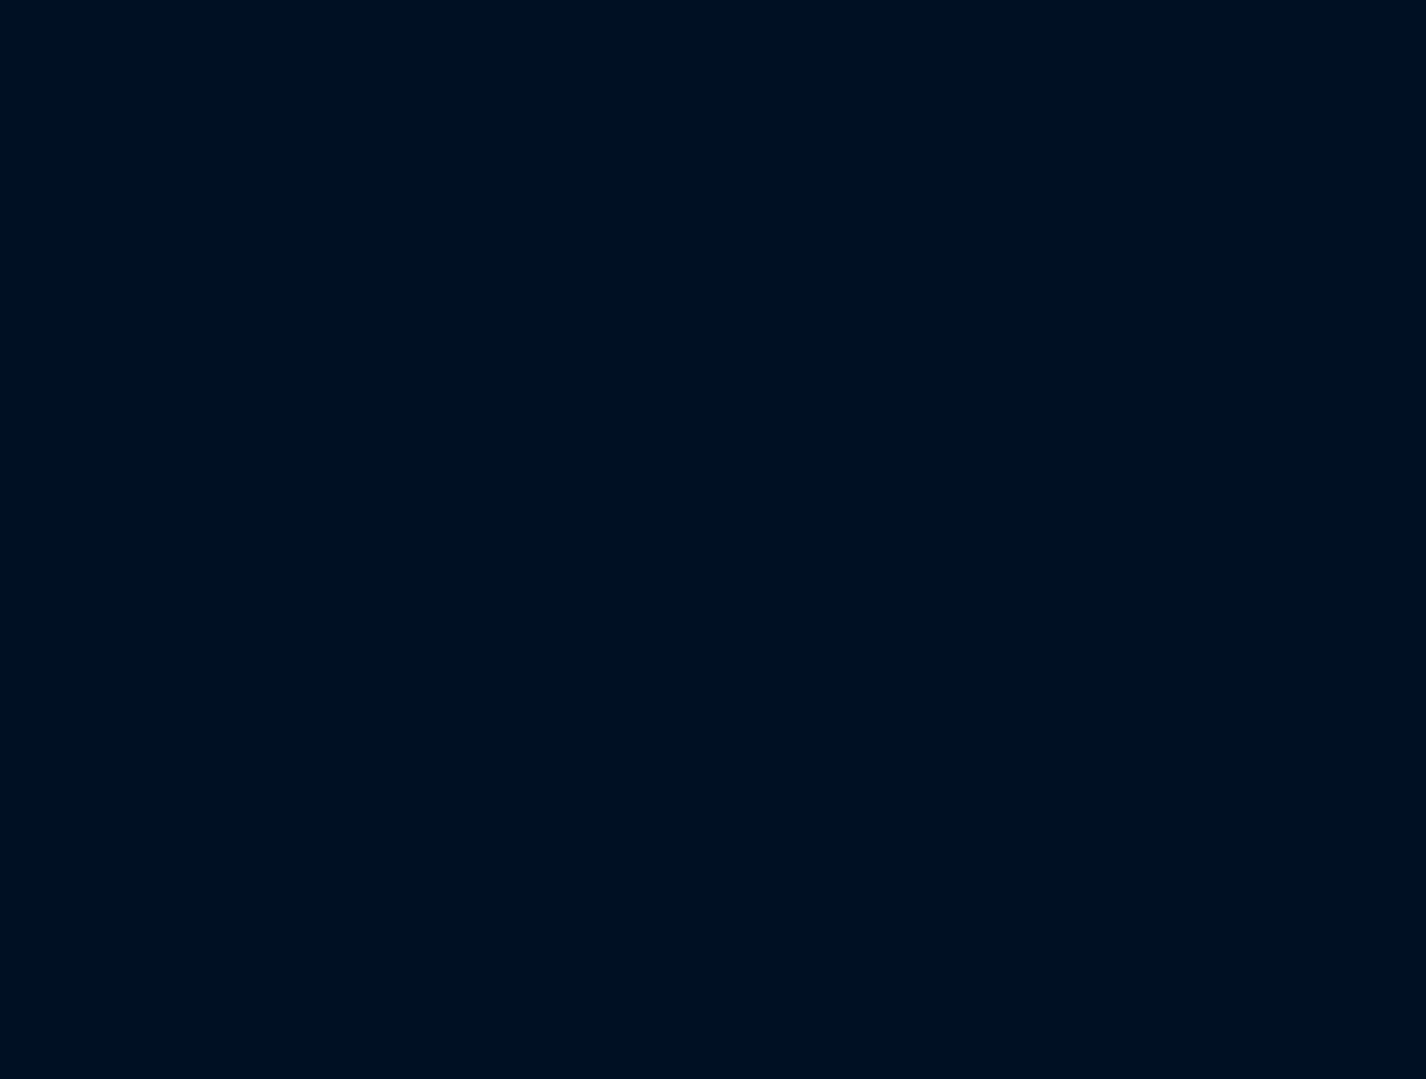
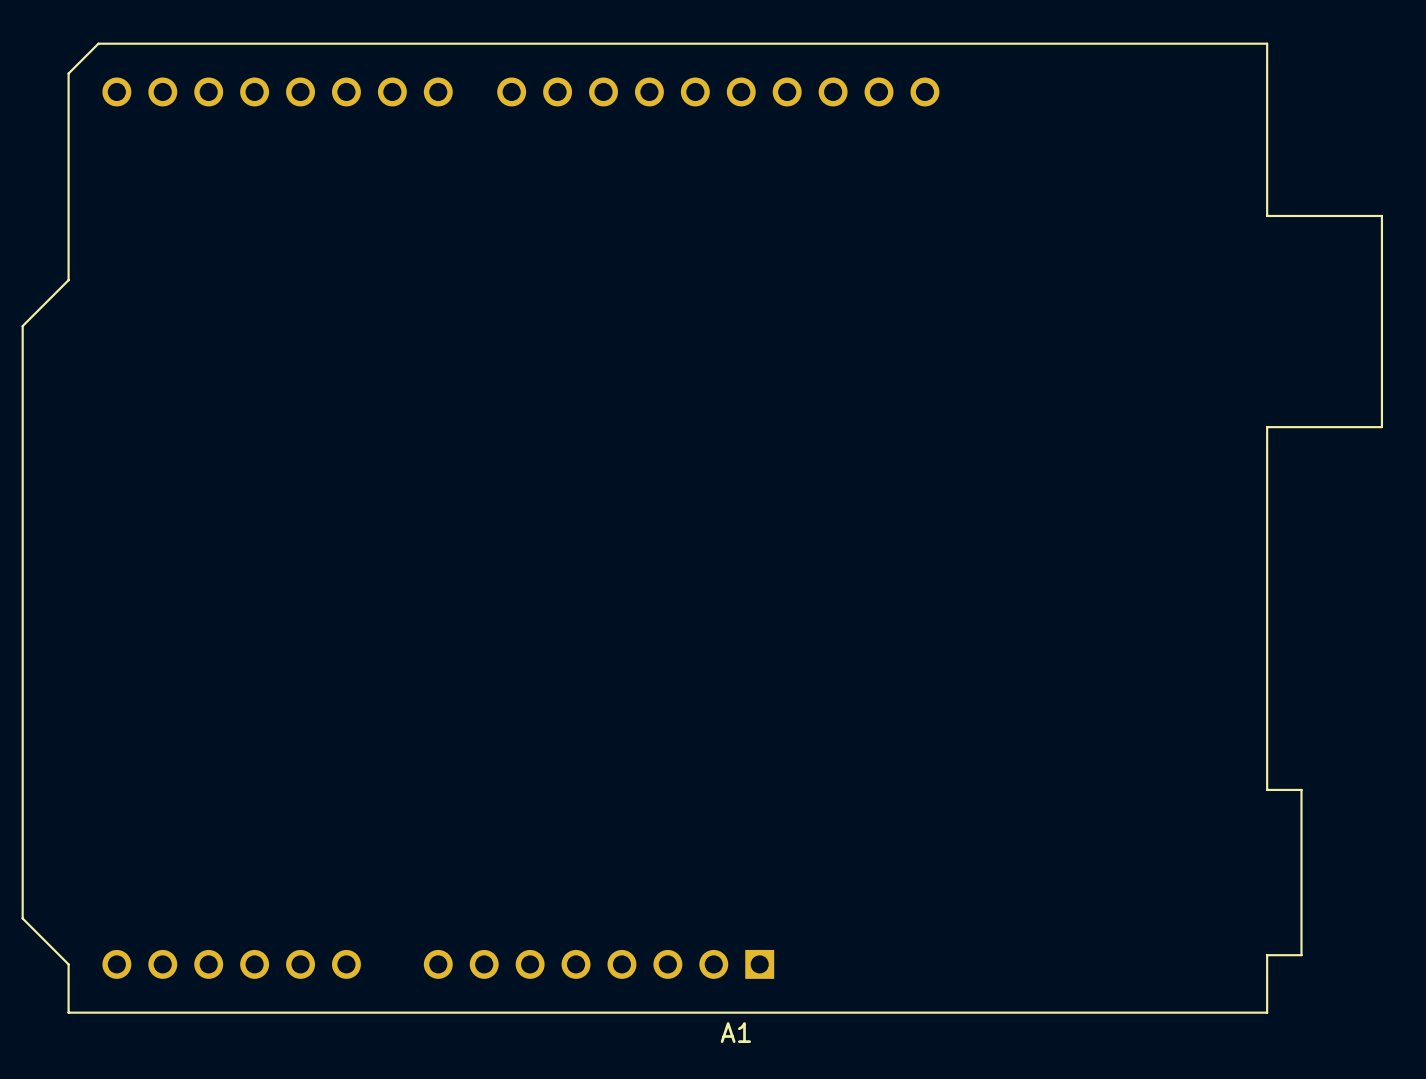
A1: none -> (702, 528)

